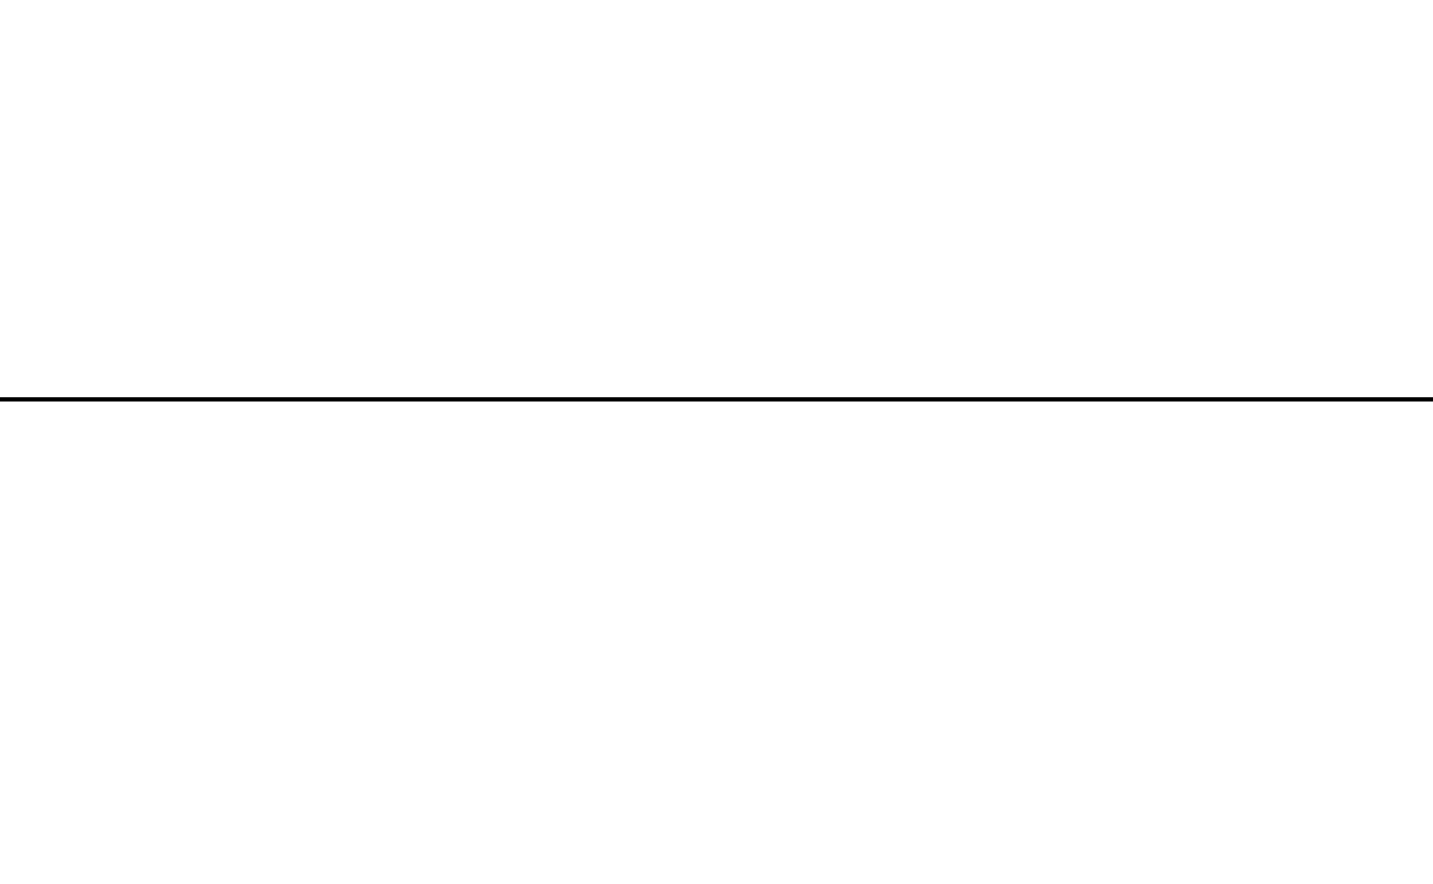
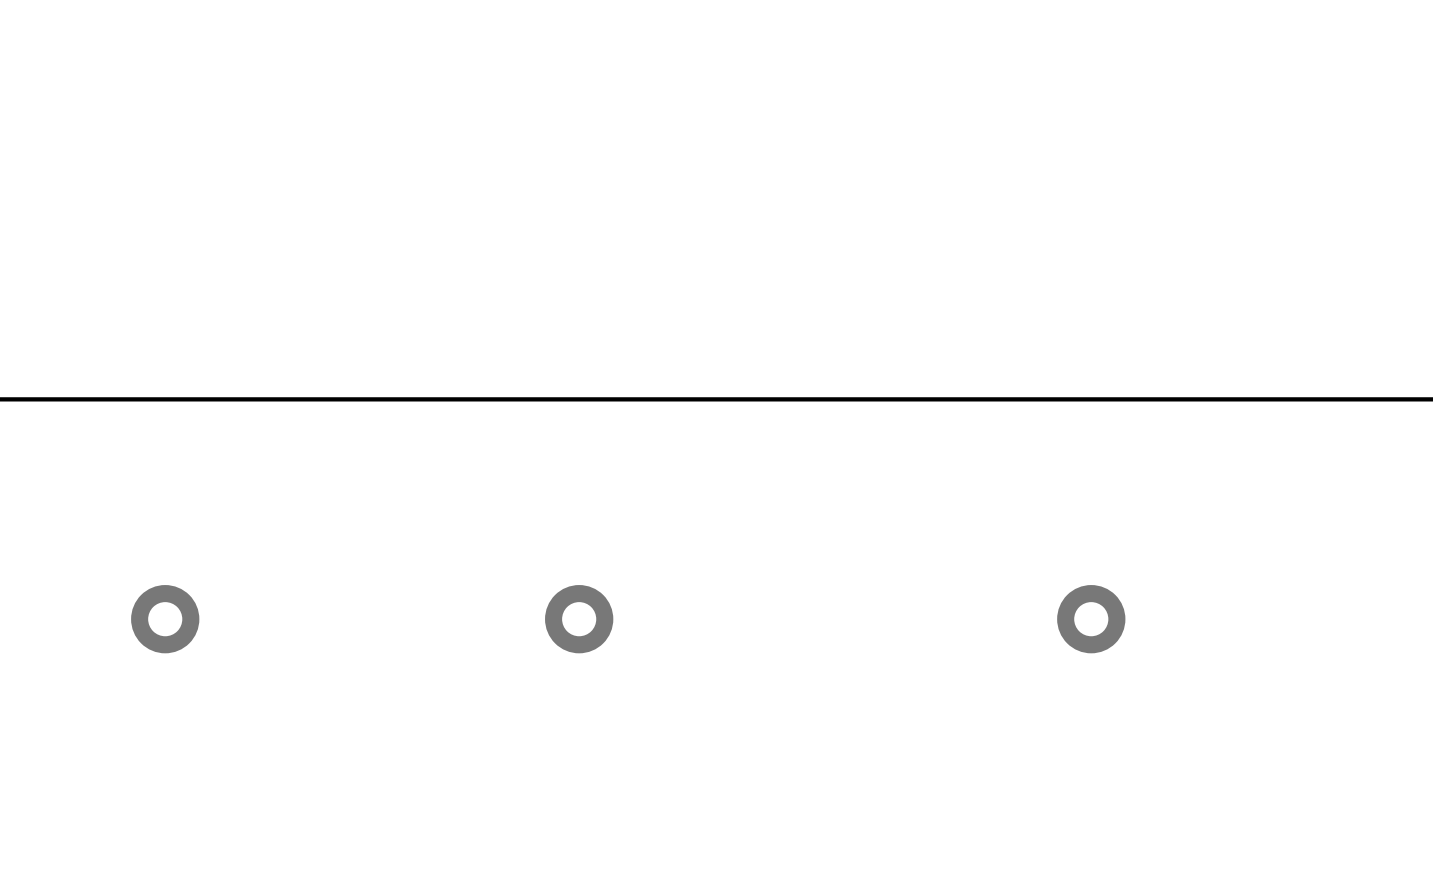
via: none -> (165, 619)
via: none -> (579, 619)
via: none -> (1091, 619)

